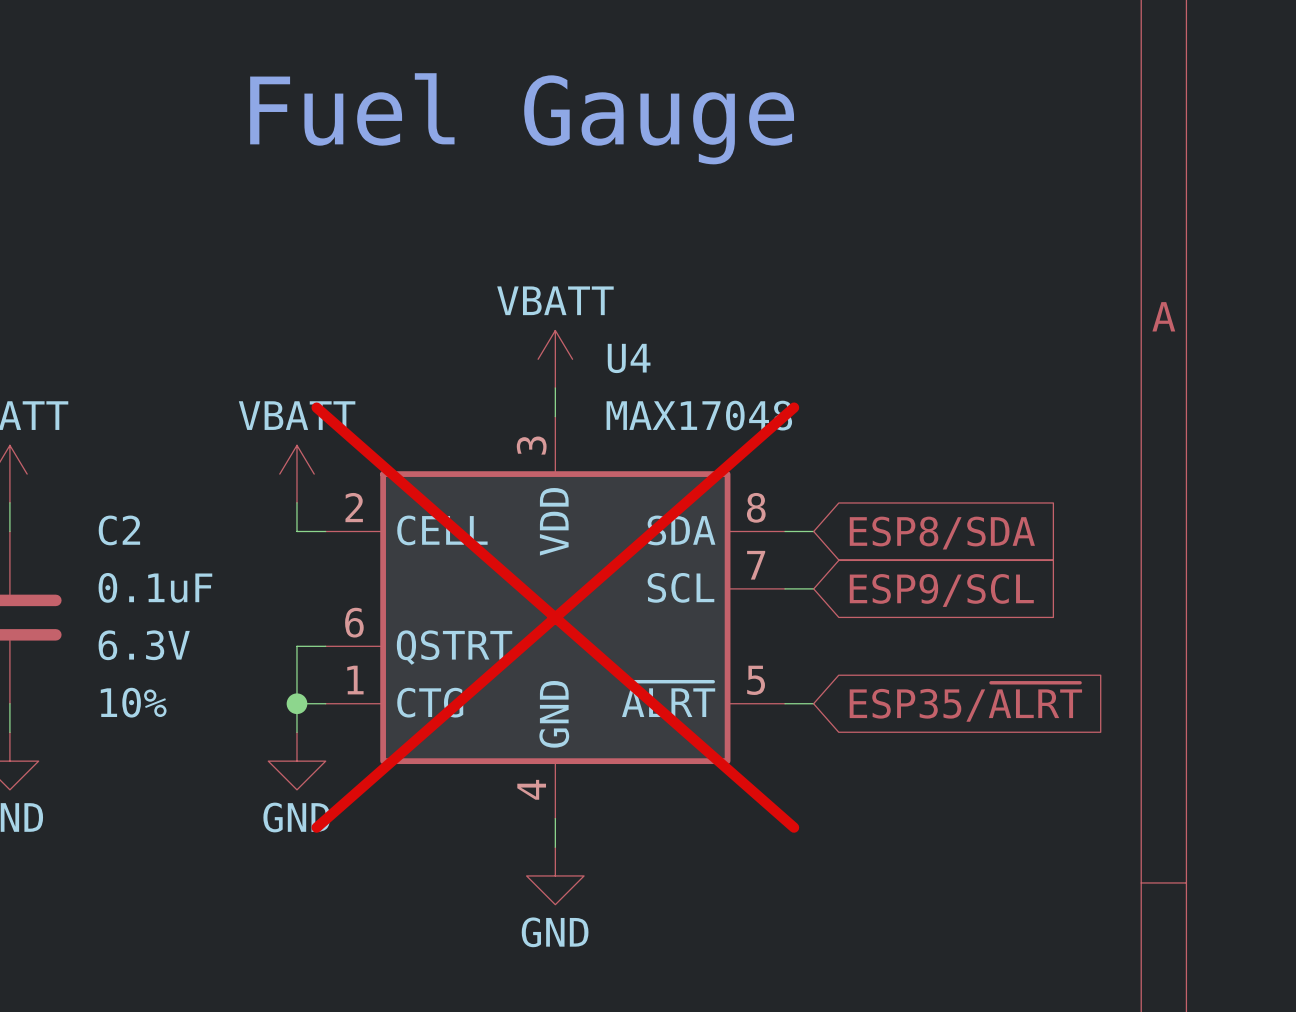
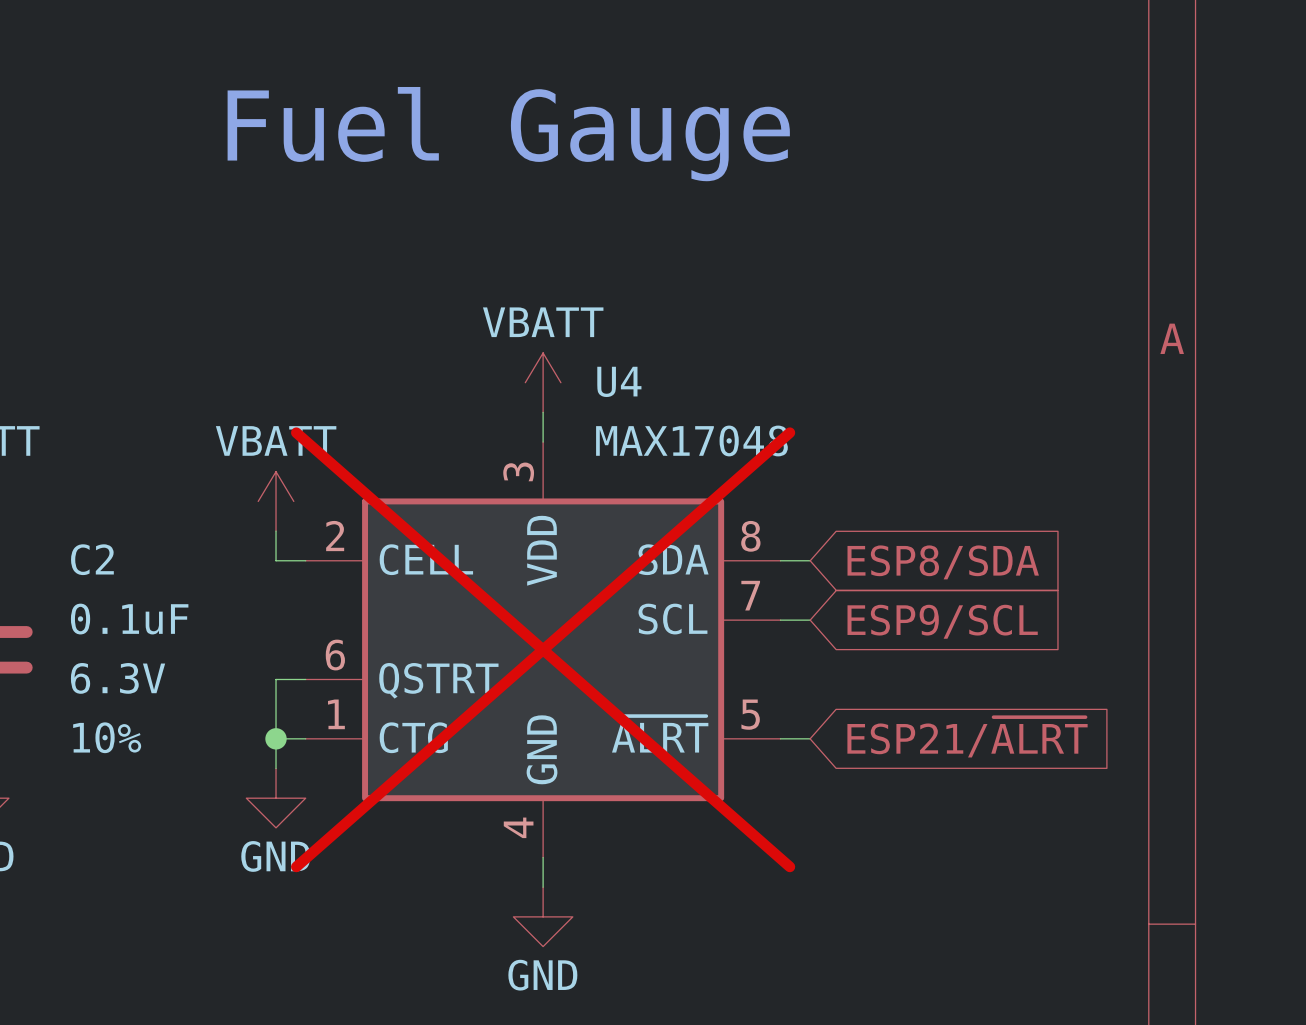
global label: ESP35/~{ALRT} (965, 702) -> ESP21/~{ALRT} (967, 737)

